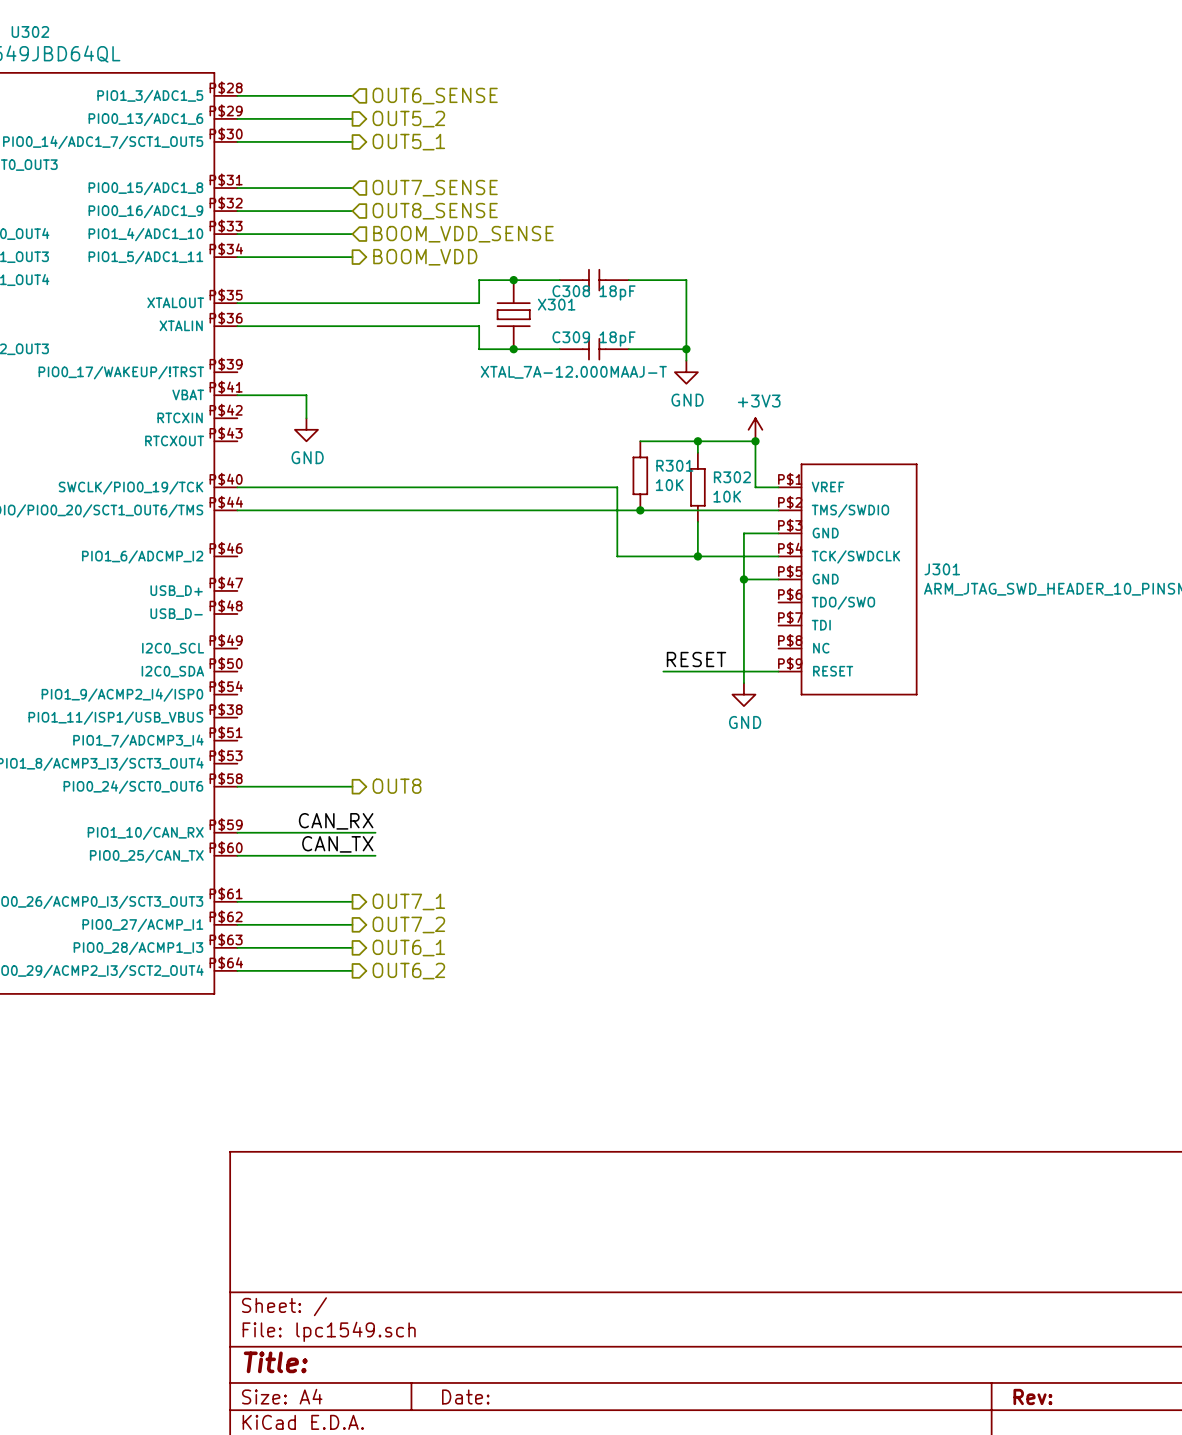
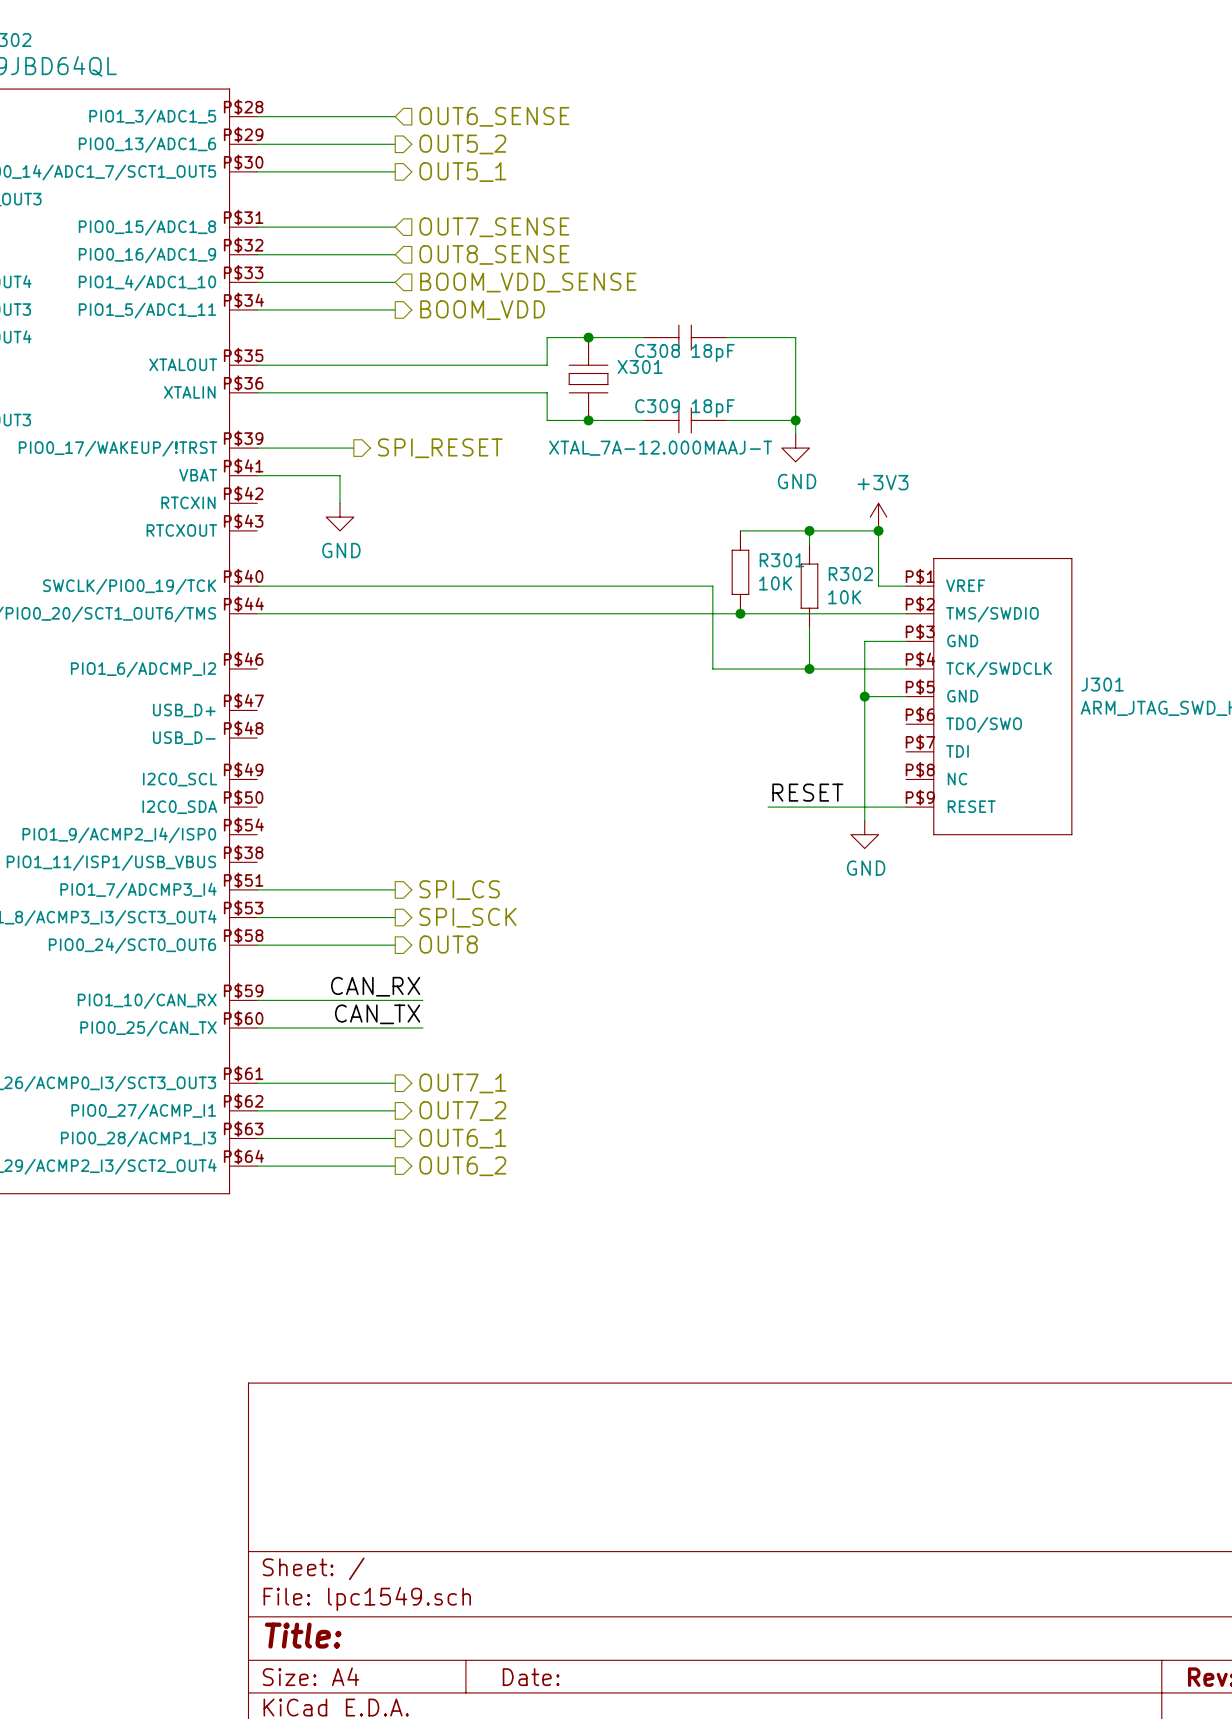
wire: none -> (257, 448) (353, 448)
hierarchical label: none -> SPI_RESET (440, 448)
wire: none -> (257, 889) (395, 889)
hierarchical label: none -> SPI_CS (459, 890)
wire: none -> (257, 917) (395, 917)
hierarchical label: none -> SPI_SCK (467, 917)

